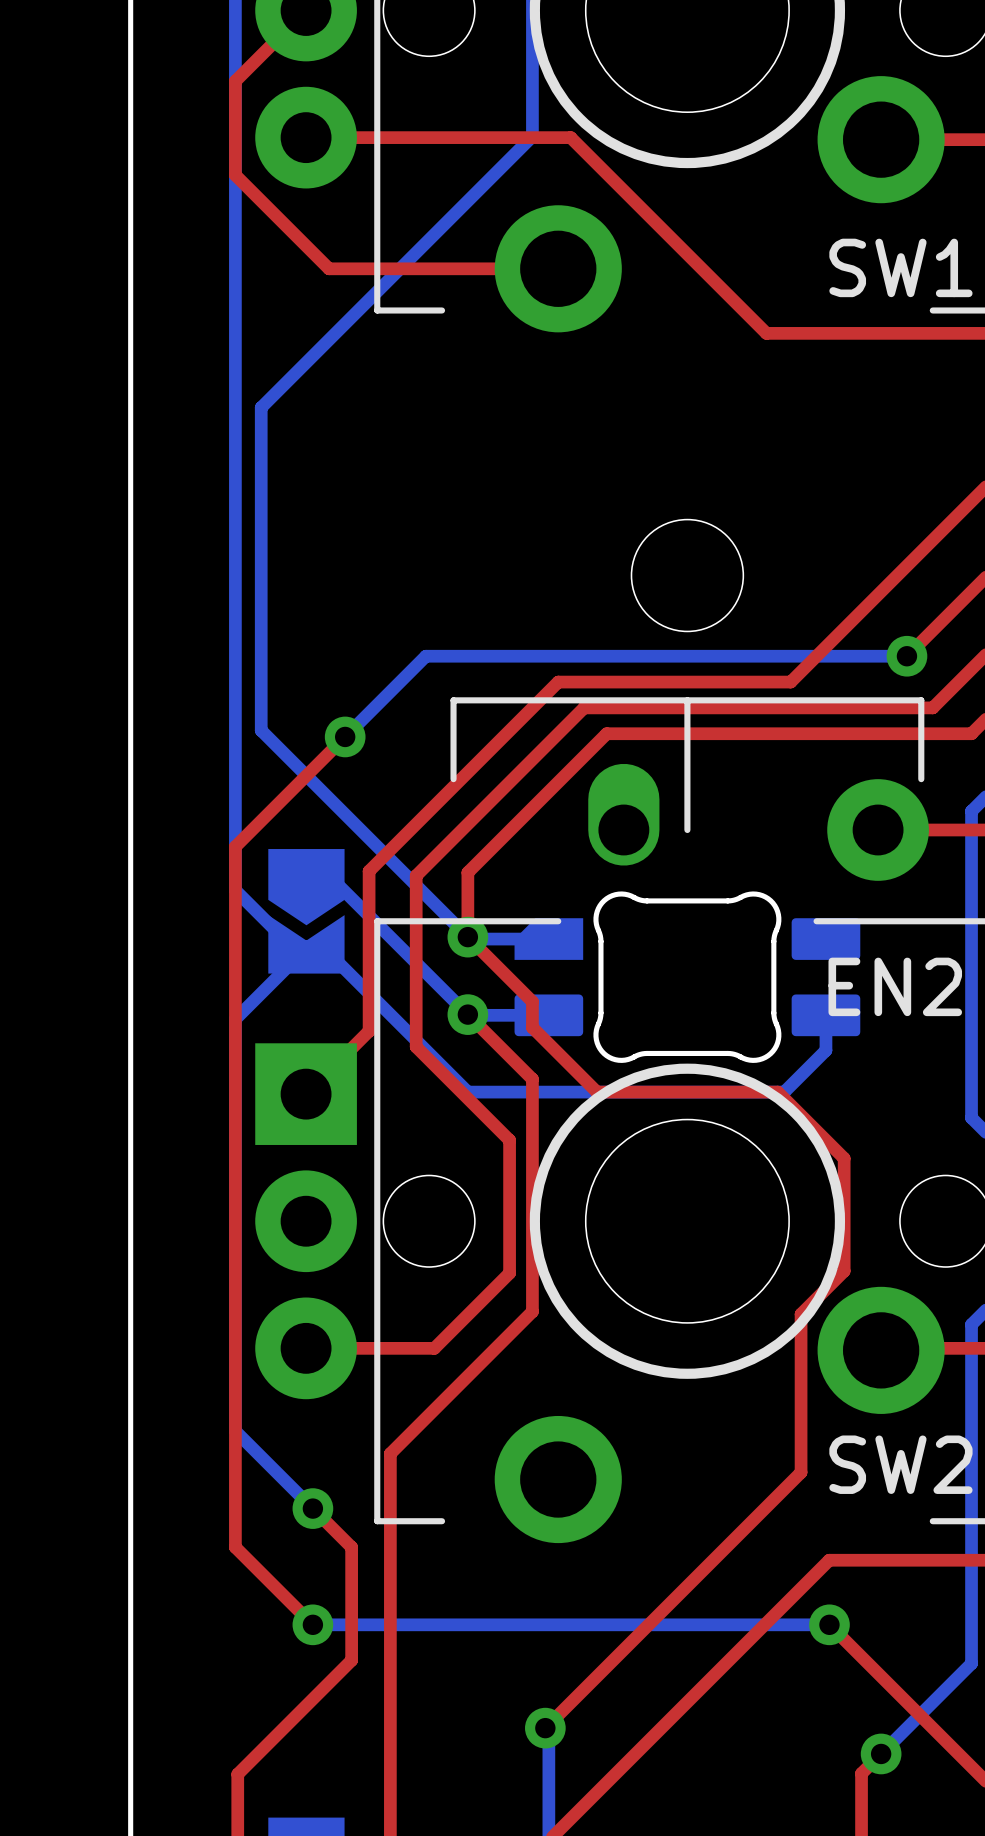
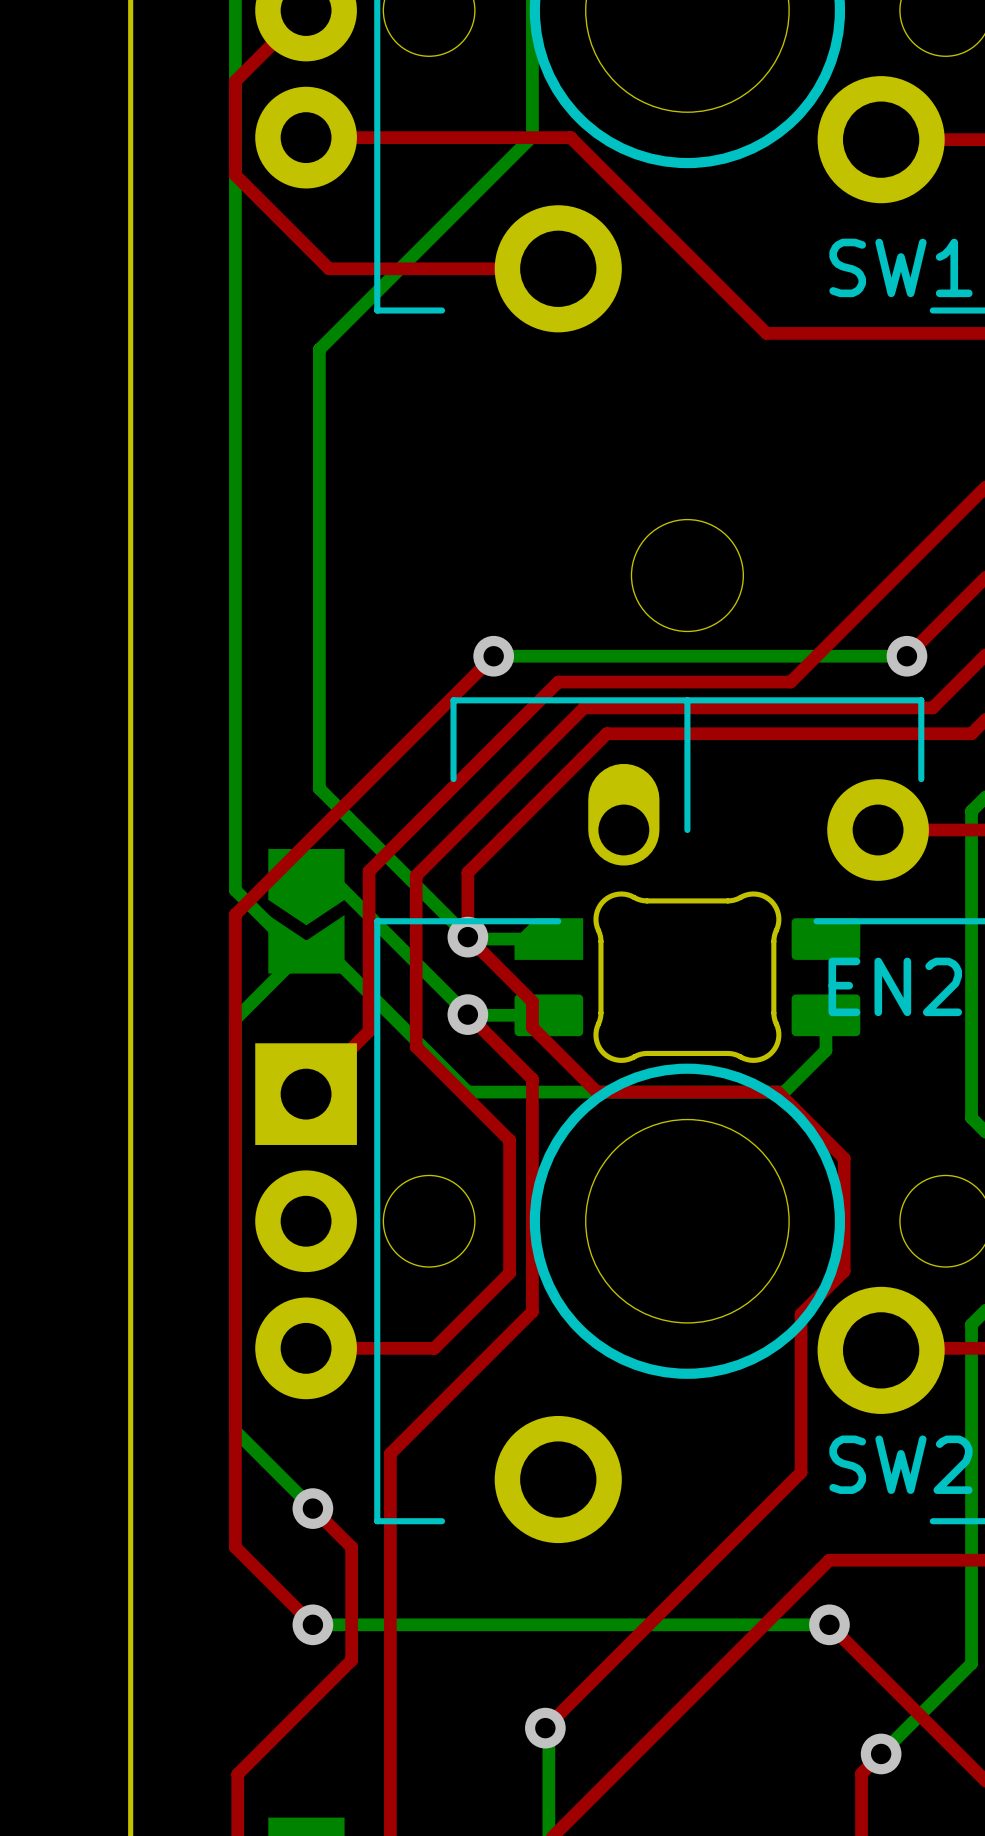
bottom track: (319, 349) (261, 407) (261, 730) (319, 788) -> (319, 349) (319, 788)
bottom track: (493, 656) (425, 656) (345, 736) -> none
top track: (345, 736) (235, 846) (235, 914) -> (493, 656) (235, 914)
via position: (345, 736) -> (493, 656)

